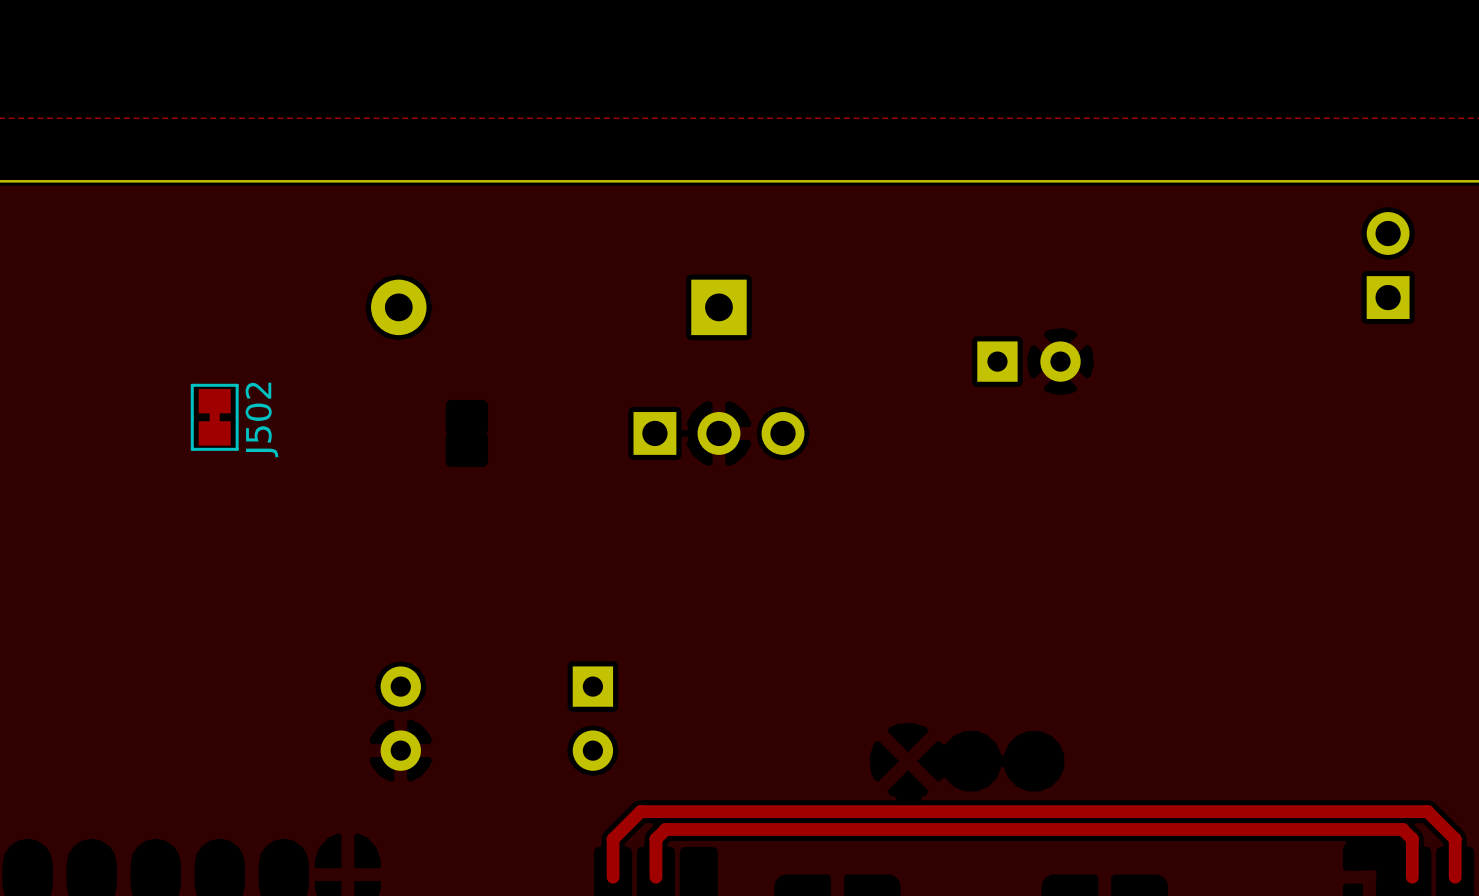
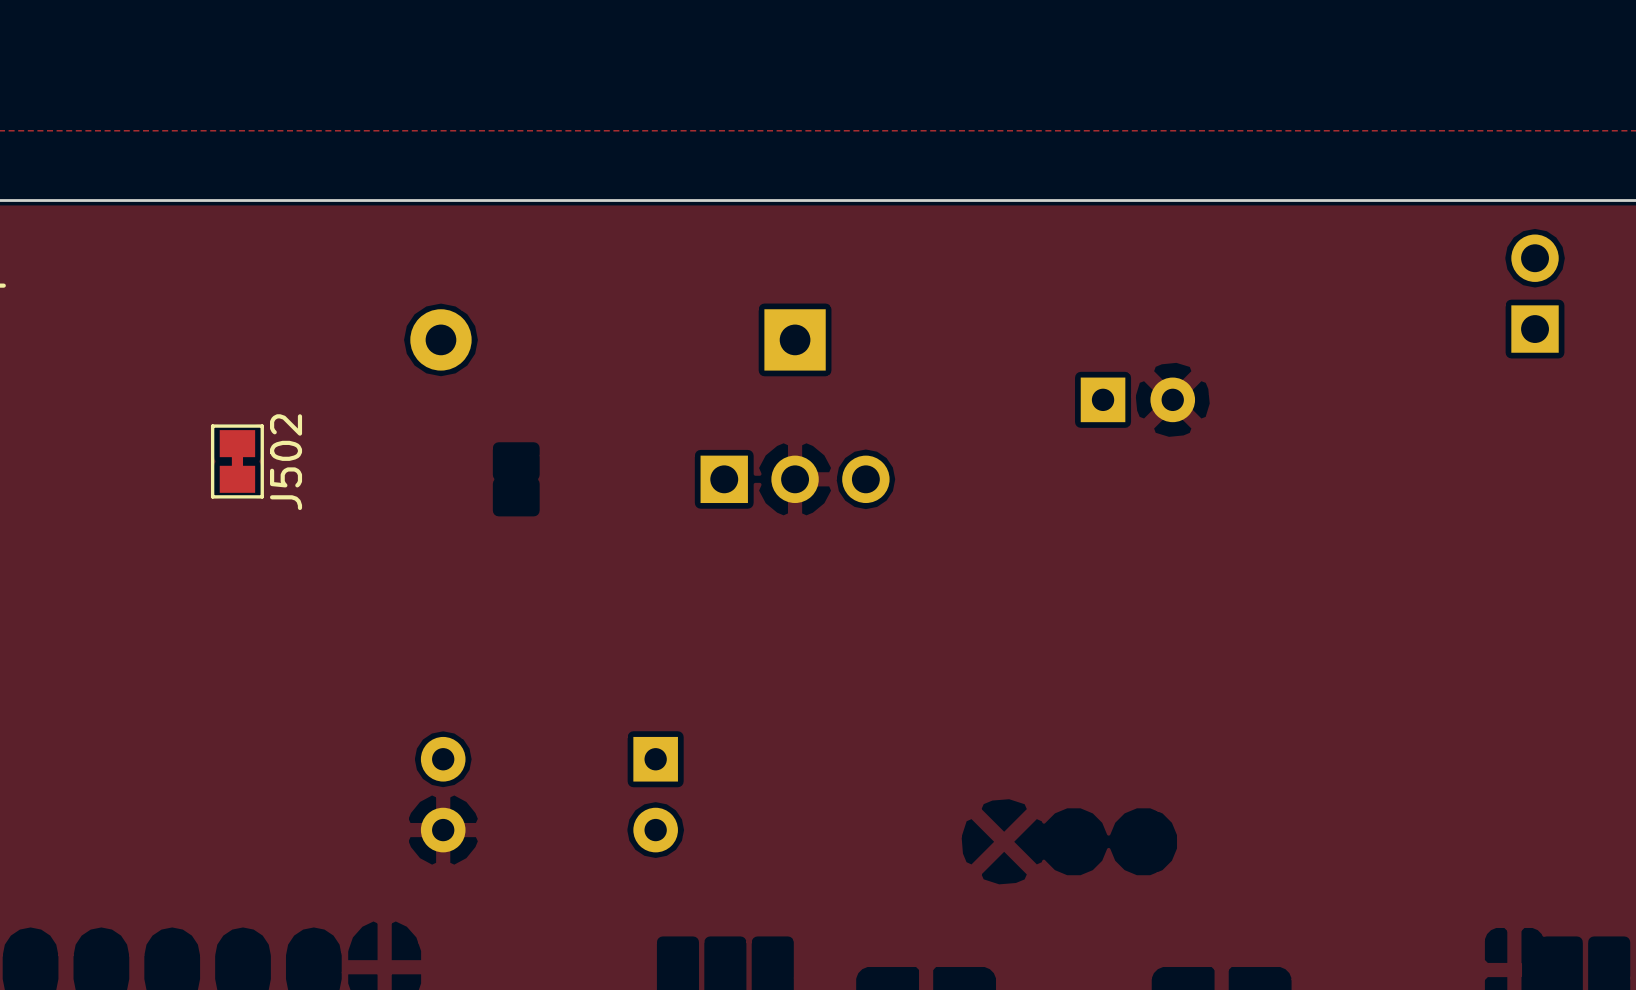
track: (613, 877) (613, 839) (640, 811) (1427, 811) (1455, 839) (1455, 877) -> none
track: (655, 877) (655, 839) (665, 829) (1402, 829) (1412, 839) (1412, 877) -> none

